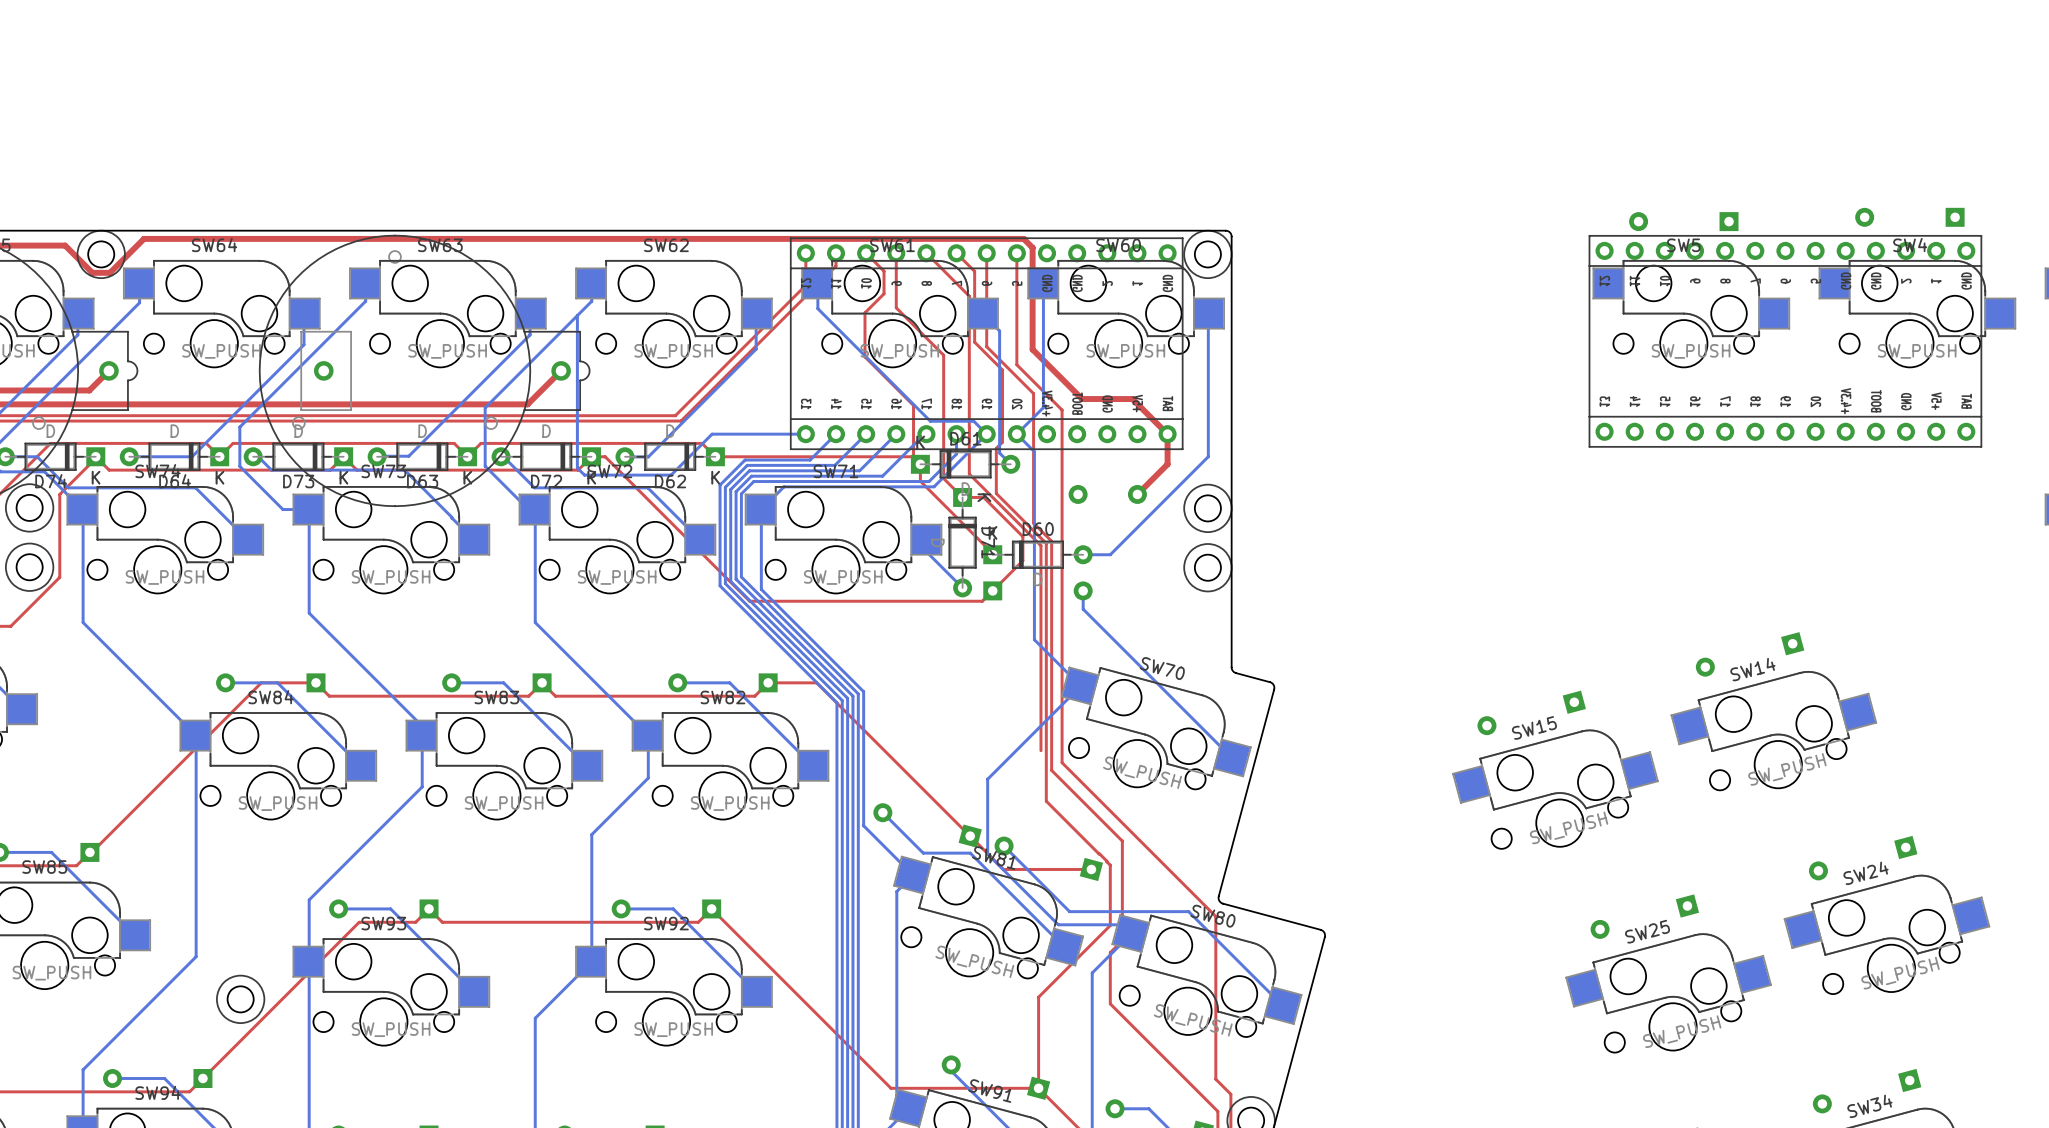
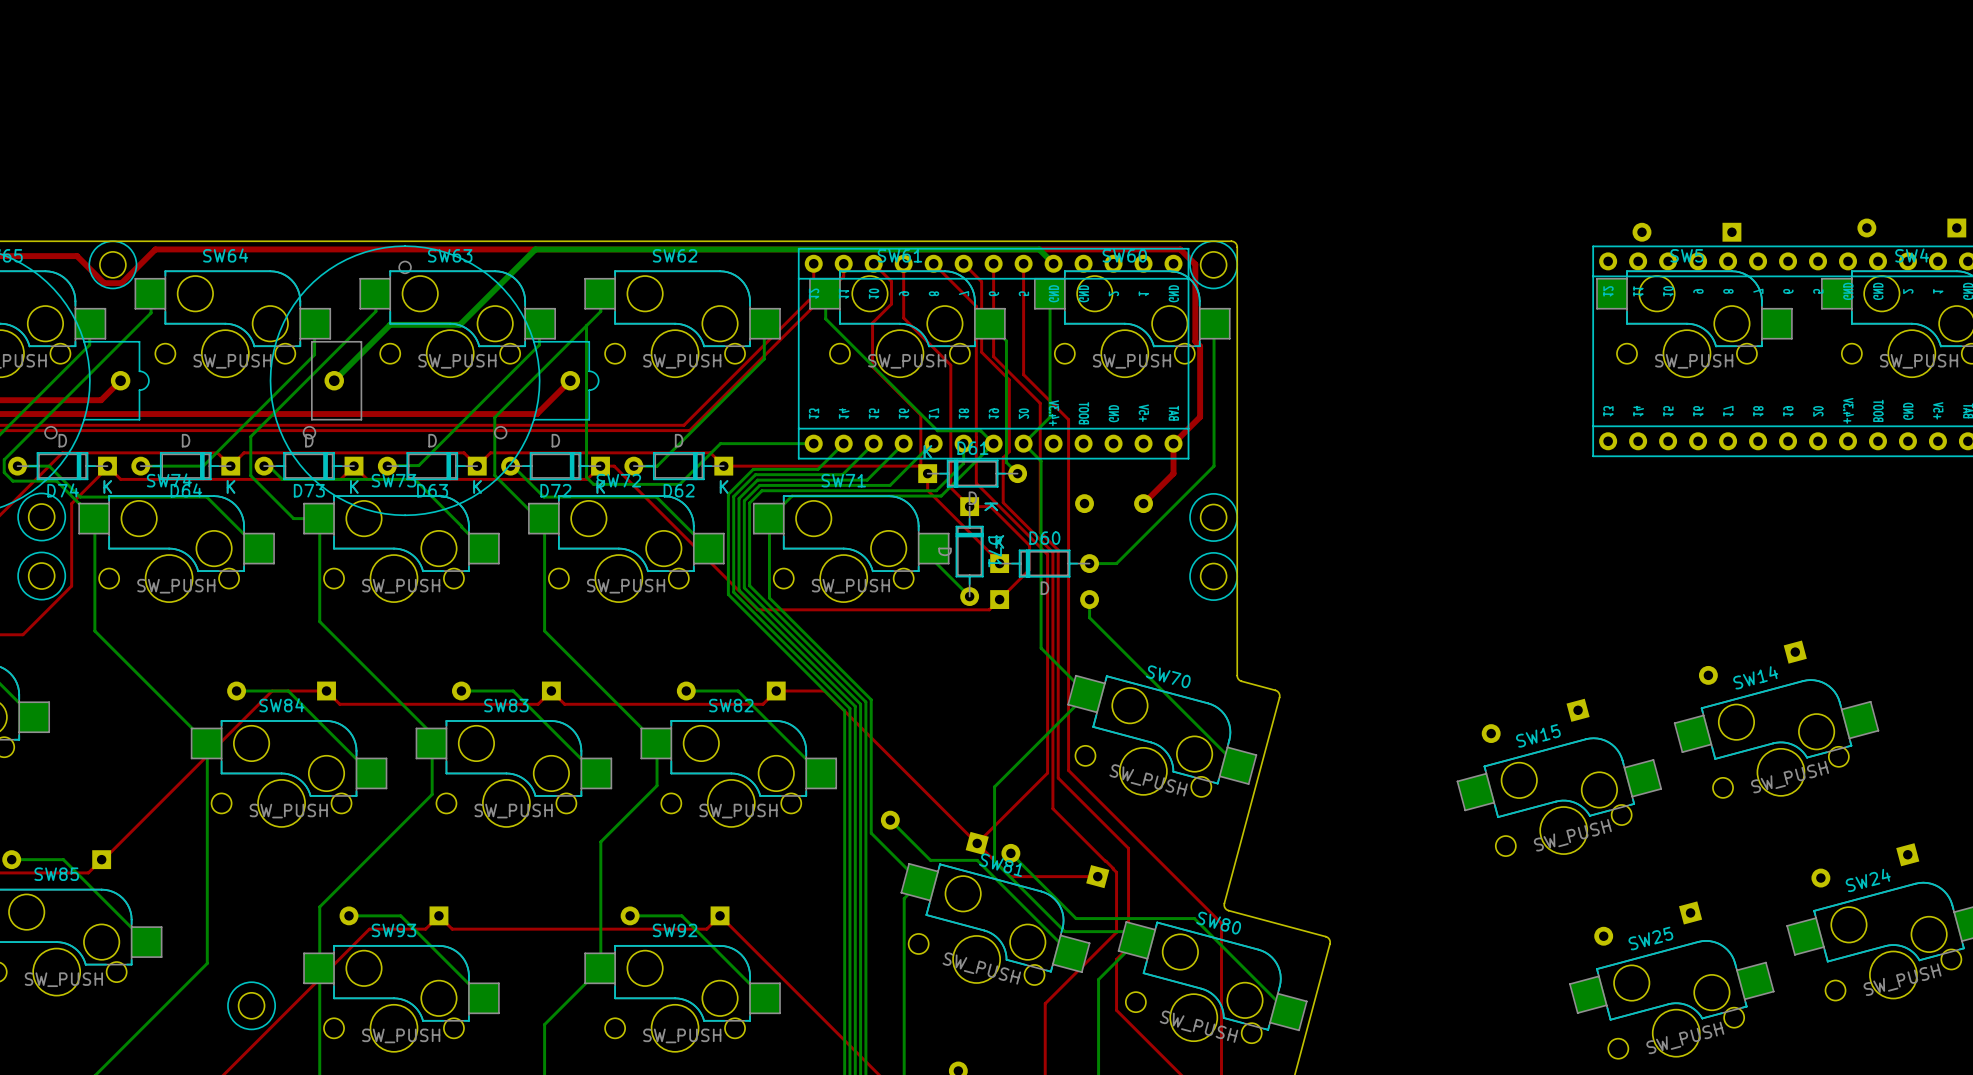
top track: (1023, 238) (1032, 247) (1032, 349) (1082, 399) (1132, 399) (1167, 434) -> (1030, 249) (1180, 249) (1195, 264) (1195, 341) (1200, 346) (1200, 417) (1173, 443)
bottom track: none -> (1053, 263) (1039, 249) (535, 249) (459, 324) (390, 324) (334, 380)
top track: none -> (1047, 758) (1047, 773) (977, 843)

